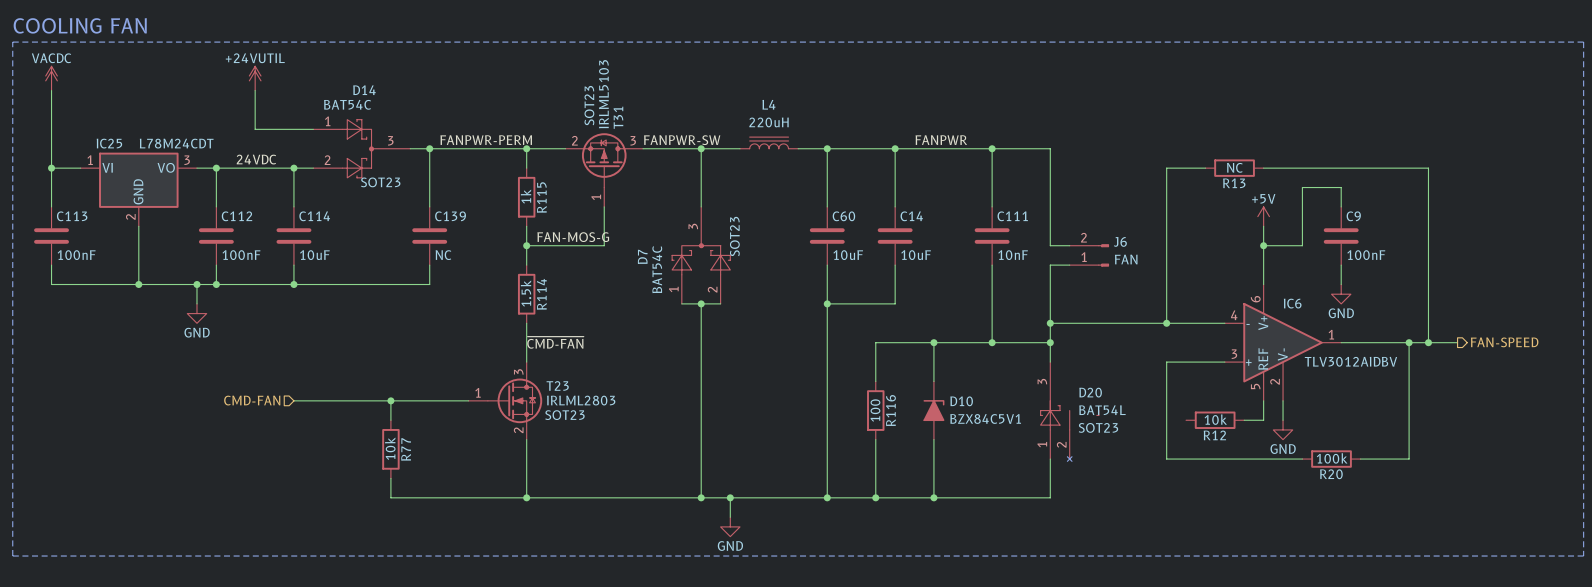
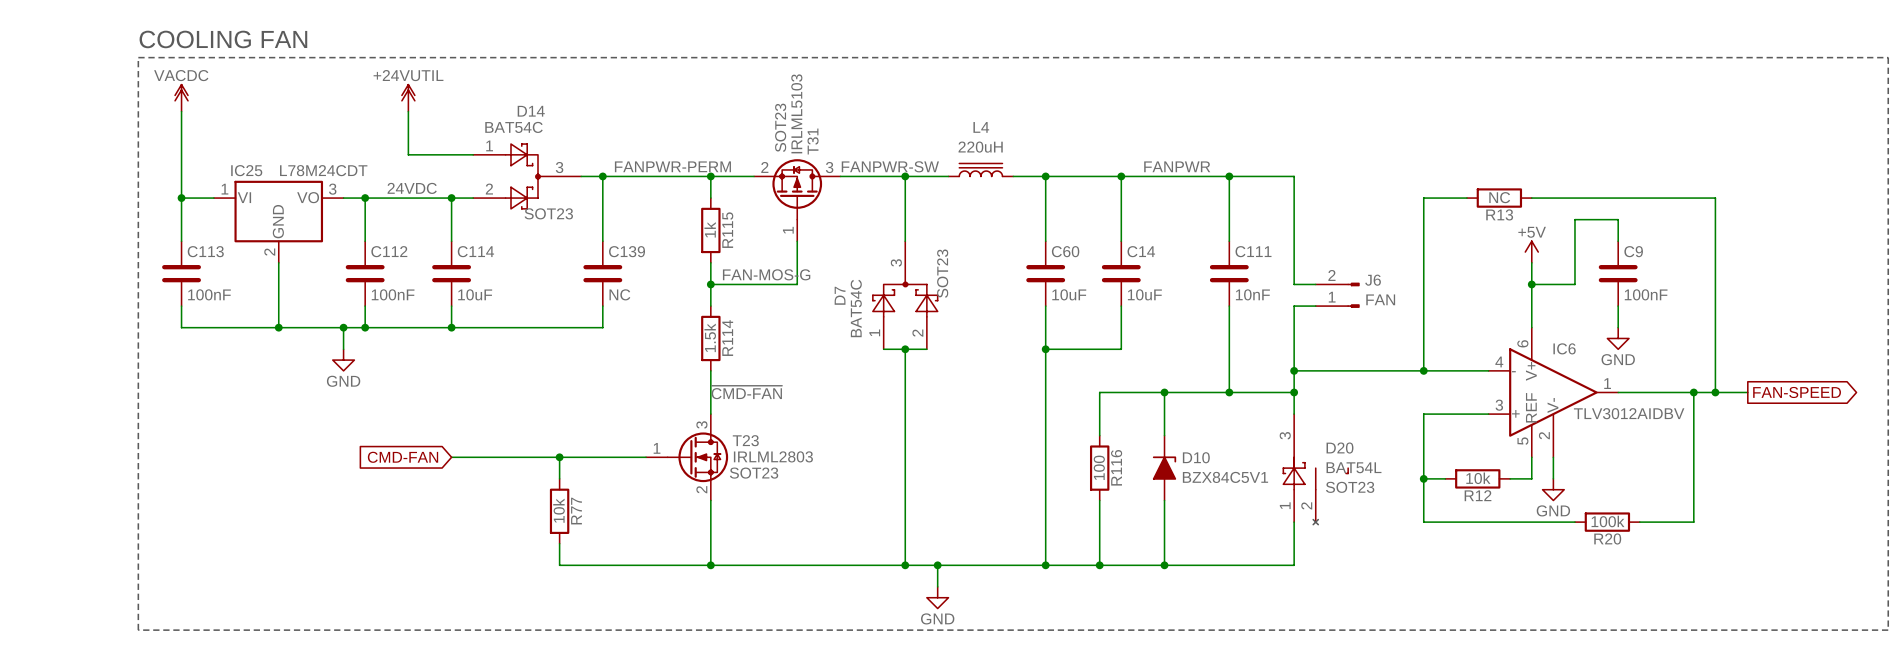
global label: none -> FAN-SPEED (1797, 392)
hierarchical label: FAN-SPEED (1504, 342) -> none
hierarchical label: CMD-FAN (252, 400) -> none
global label: none -> CMD-FAN (403, 457)
wire: none -> (1423, 478) (1445, 478)
junction: none -> (1423, 478)

